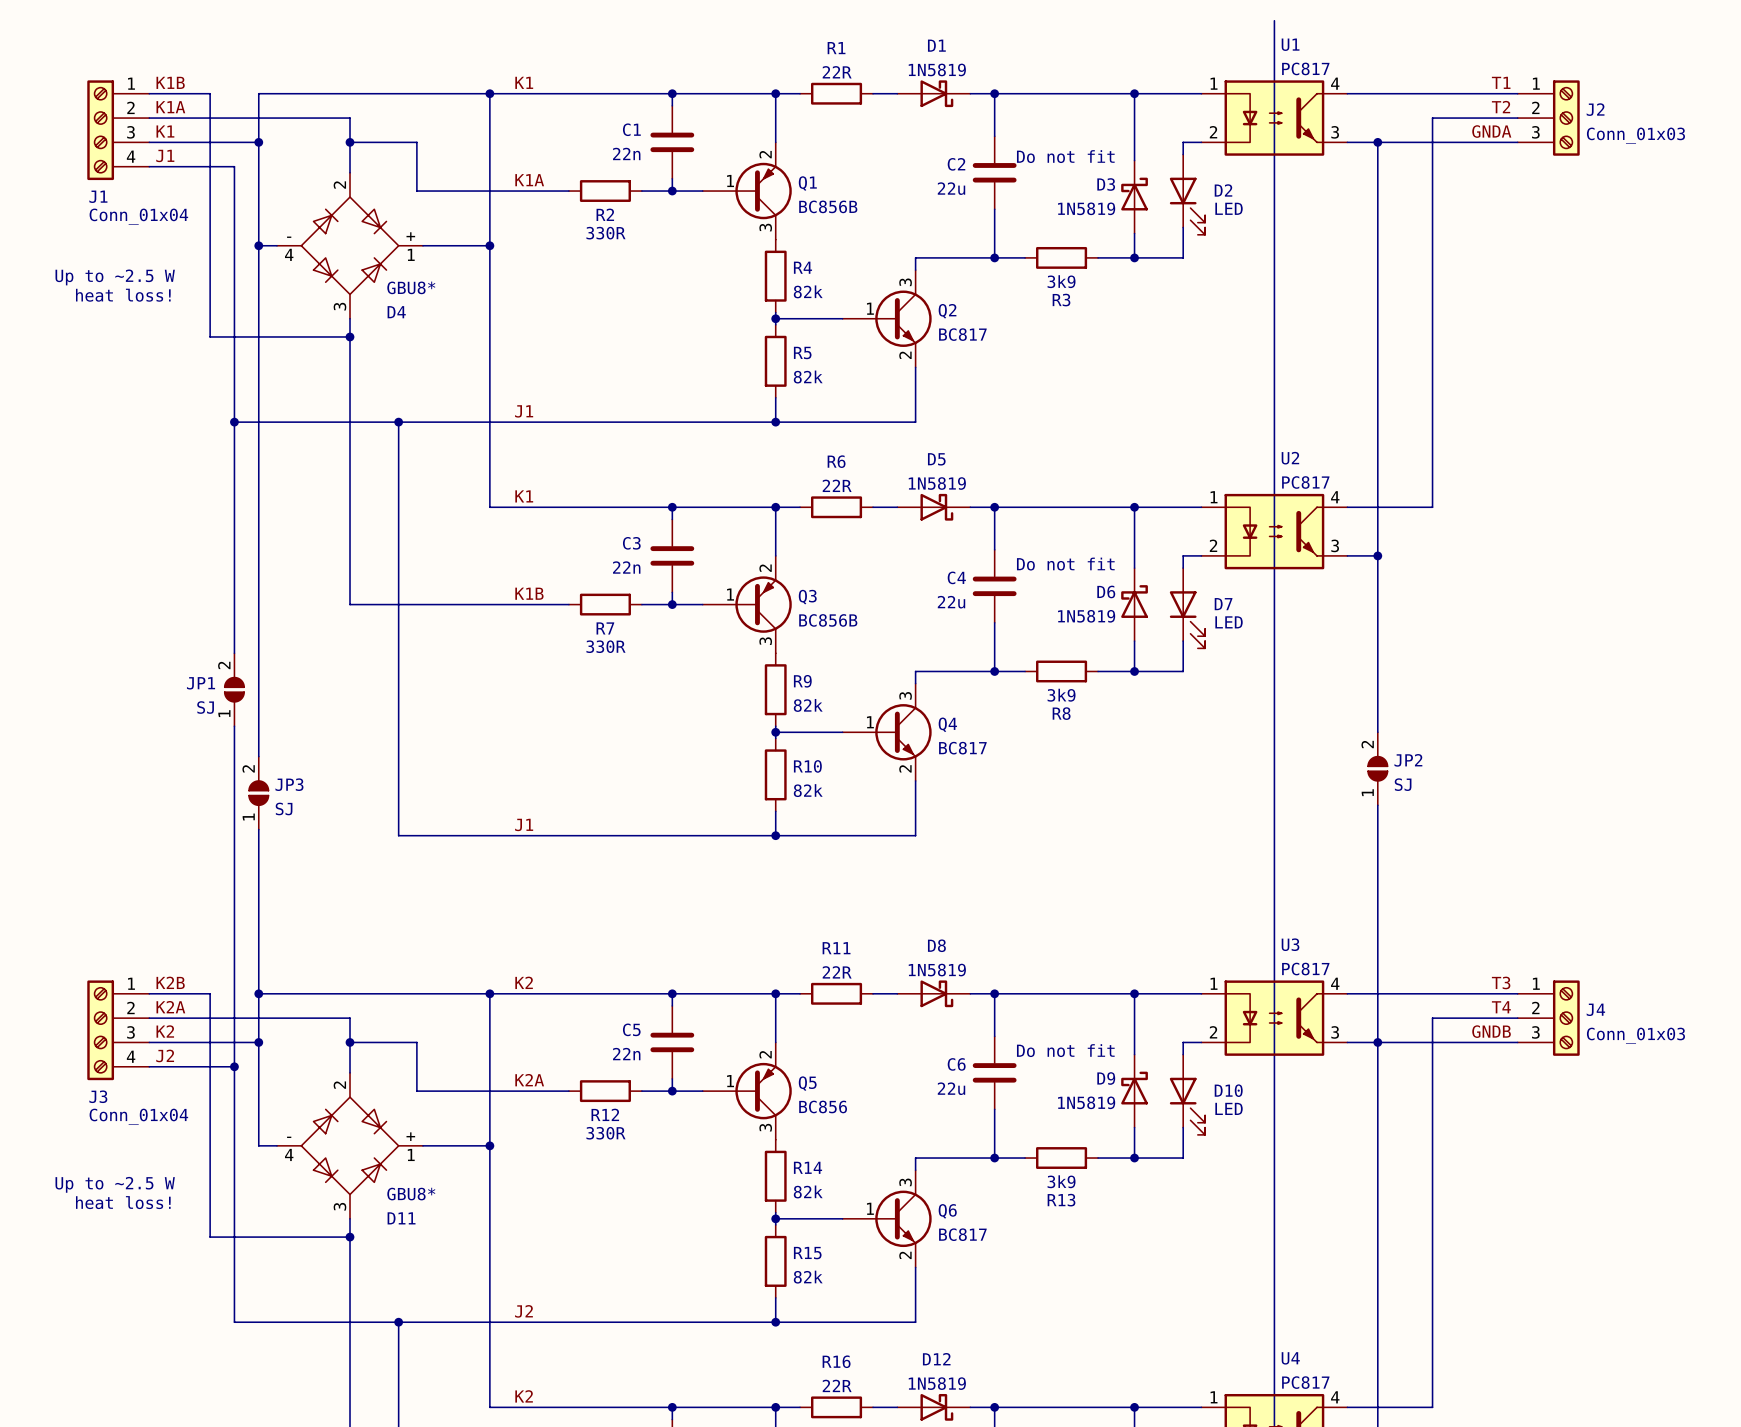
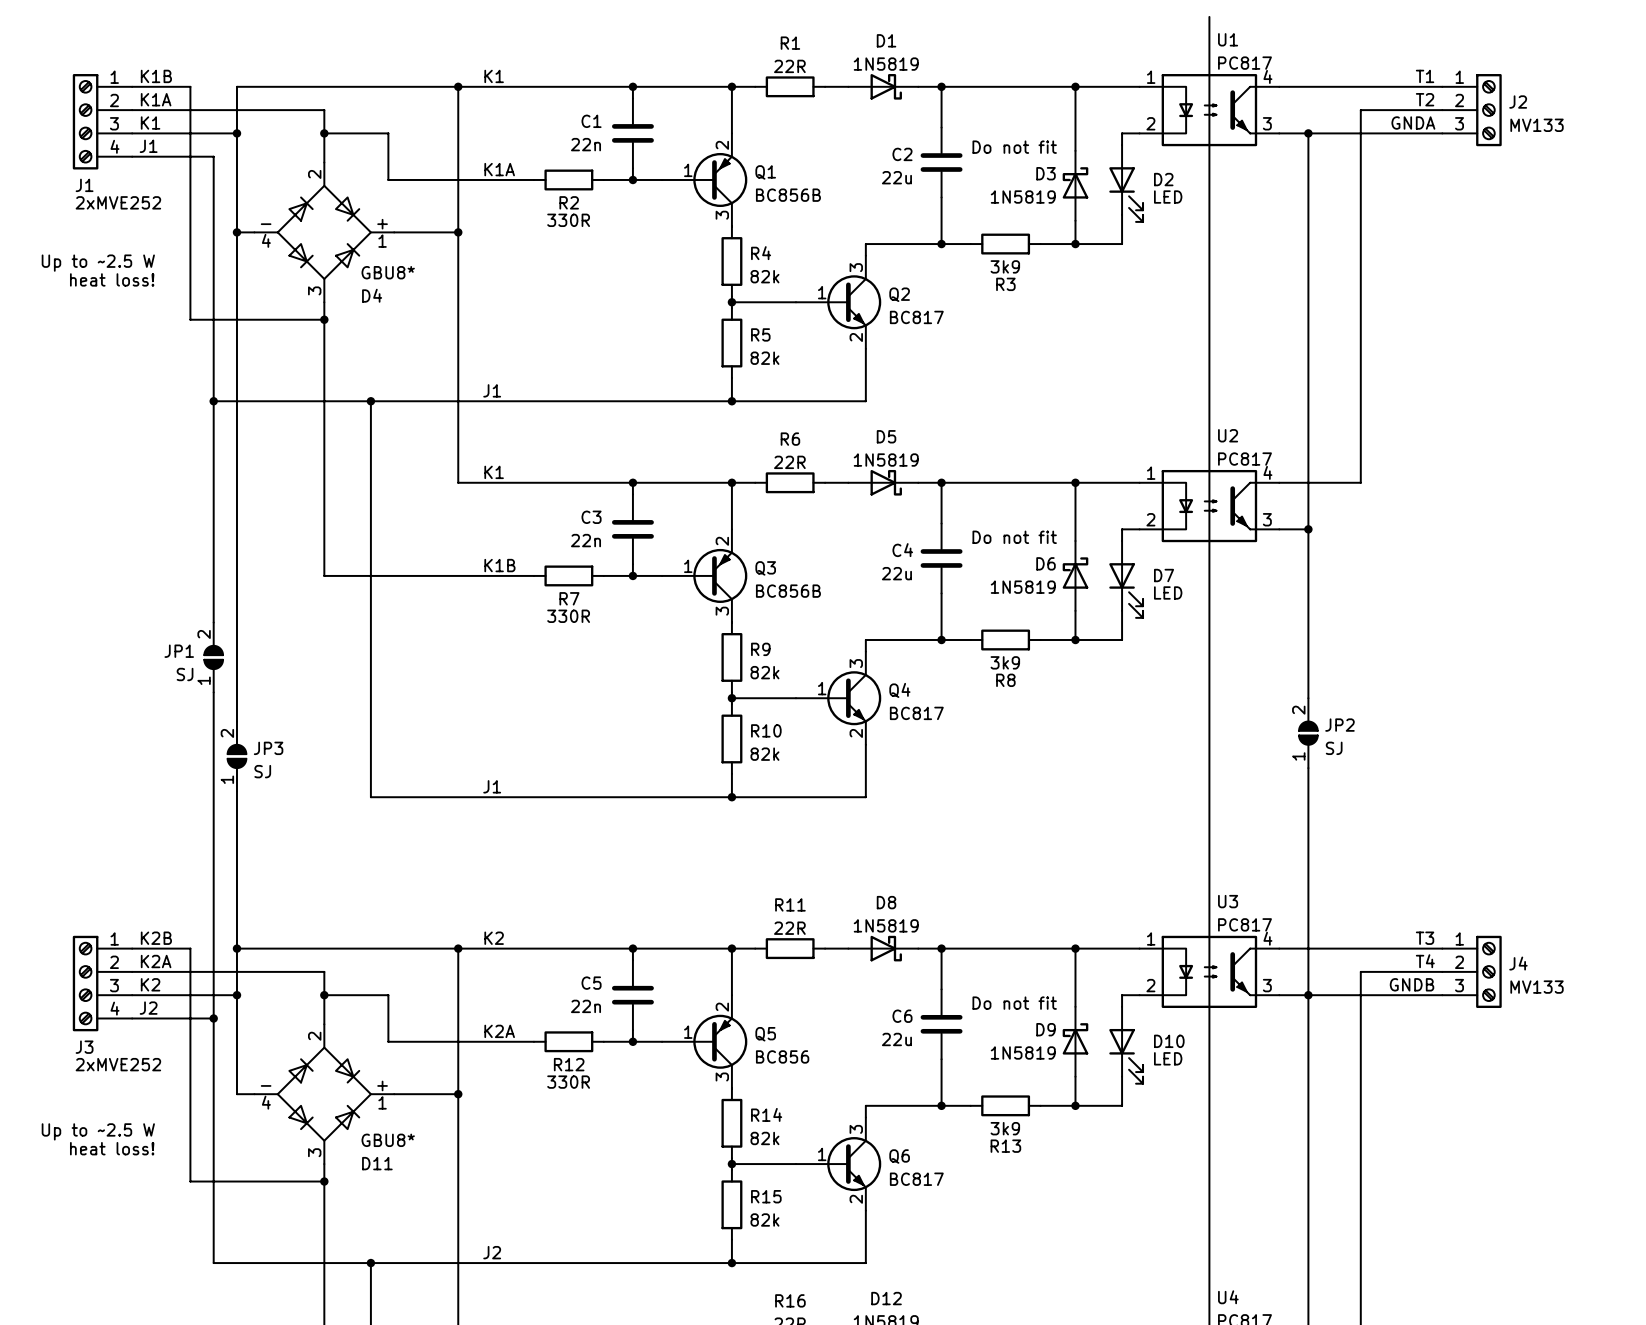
J2 value: Conn_01x03 (1635, 135) -> MV133 (1537, 125)
J1 value: Conn_01x04 (138, 216) -> 2xMVE252 (118, 202)
J4 value: Conn_01x03 (1635, 1035) -> MV133 (1537, 987)
J3 value: Conn_01x04 (138, 1116) -> 2xMVE252 (118, 1064)

